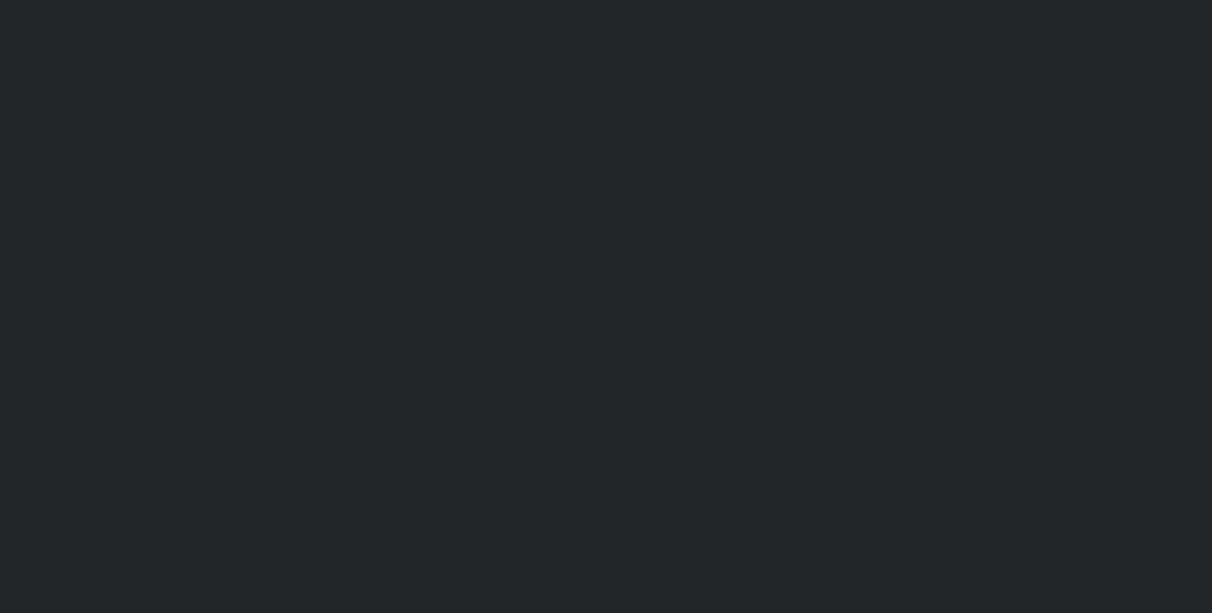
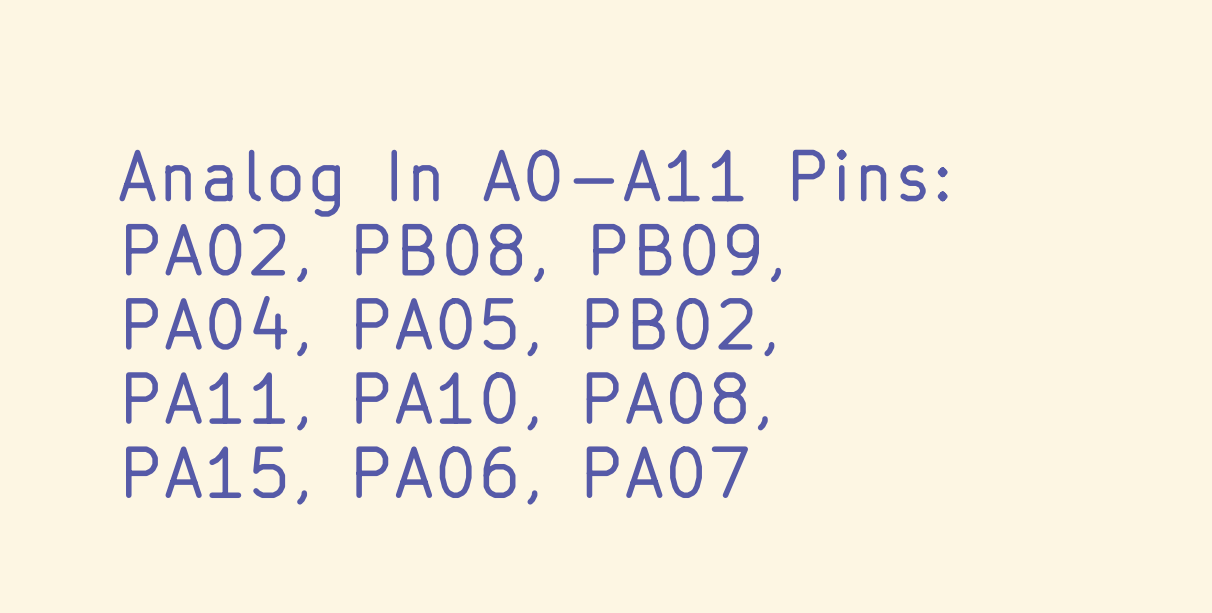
text: none -> Analog In A0-A11 Pins: (533, 183)
text: none -> PA02, PB08, PB09, (453, 253)
text: none -> PA04, PA05, PB02, (450, 326)
text: none -> PA11, PA10, PA08, (446, 401)
text: none -> PA15, PA06, PA07 (437, 475)

